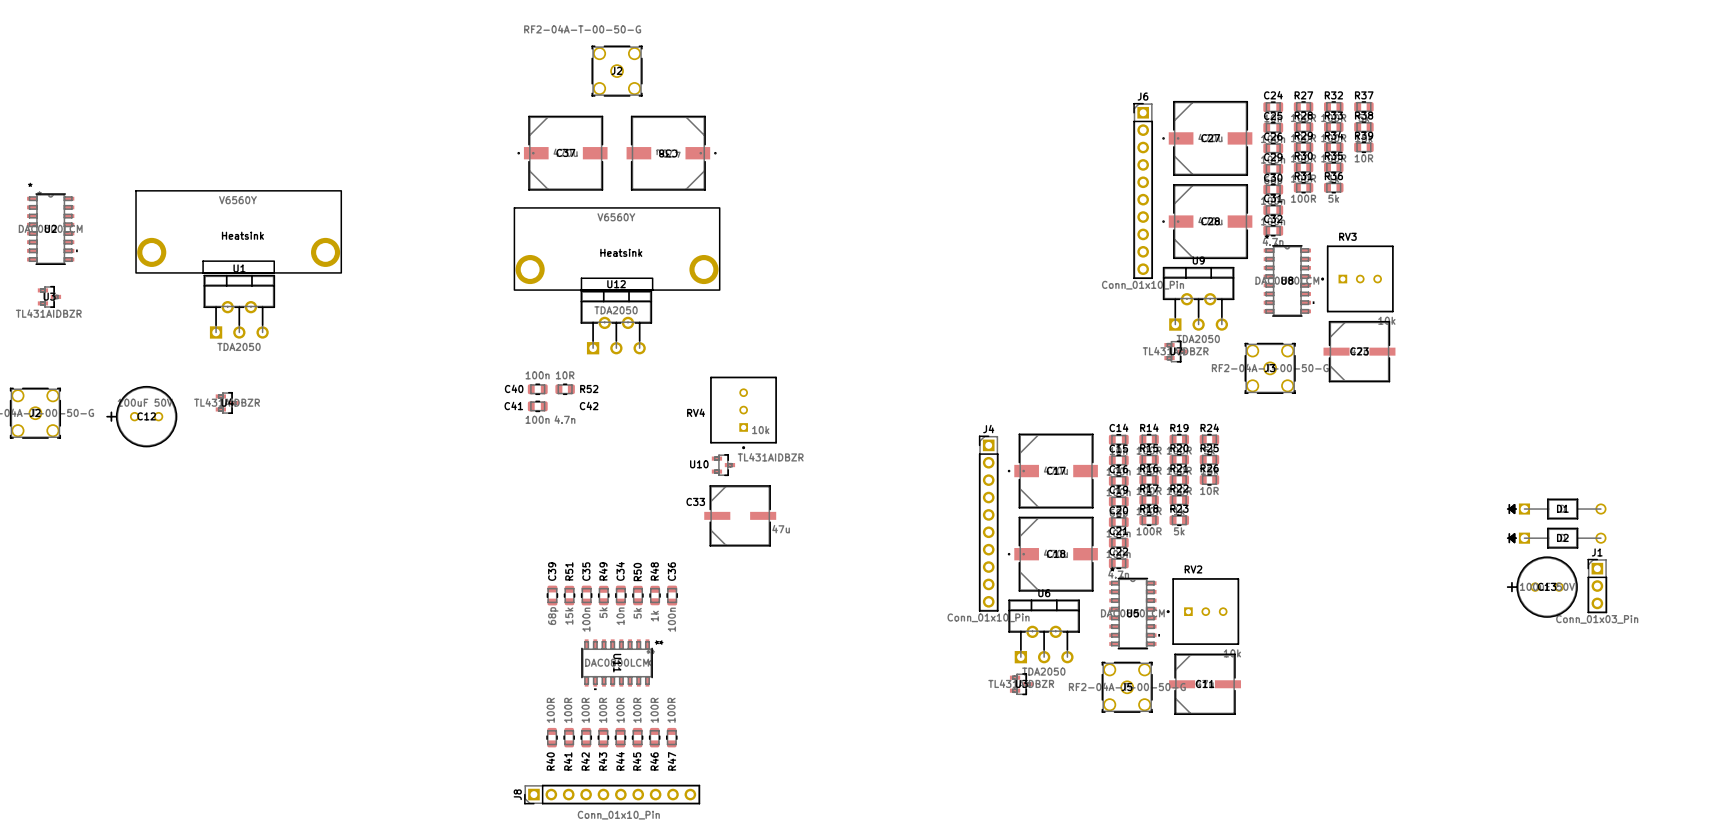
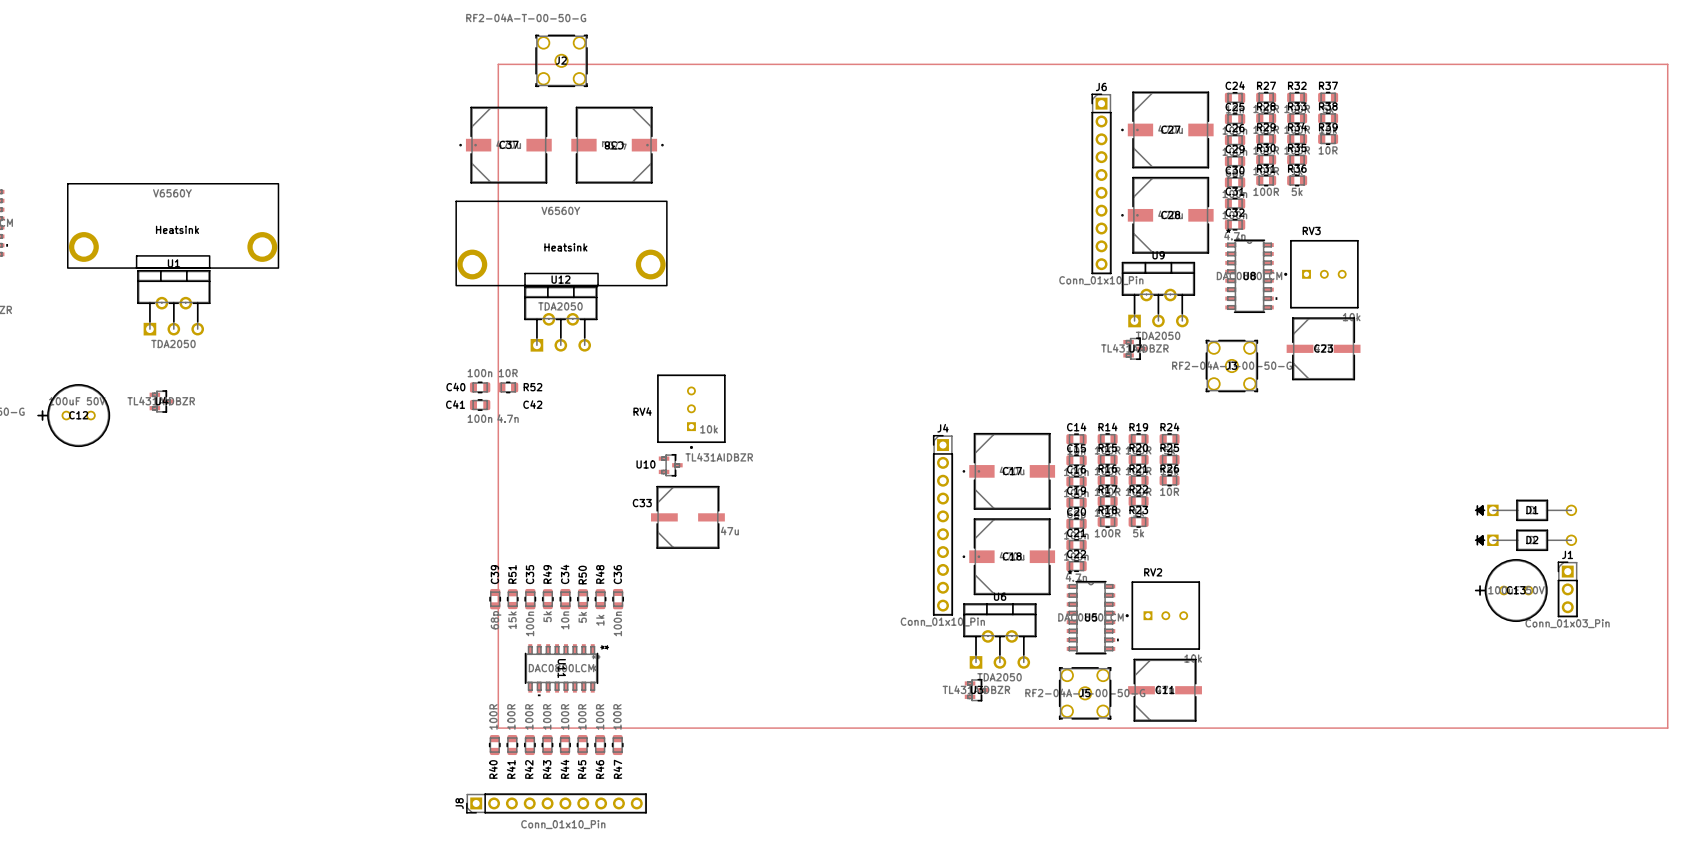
track: none -> (498, 64) (1667, 64) (1667, 728) (498, 728) (498, 64)

